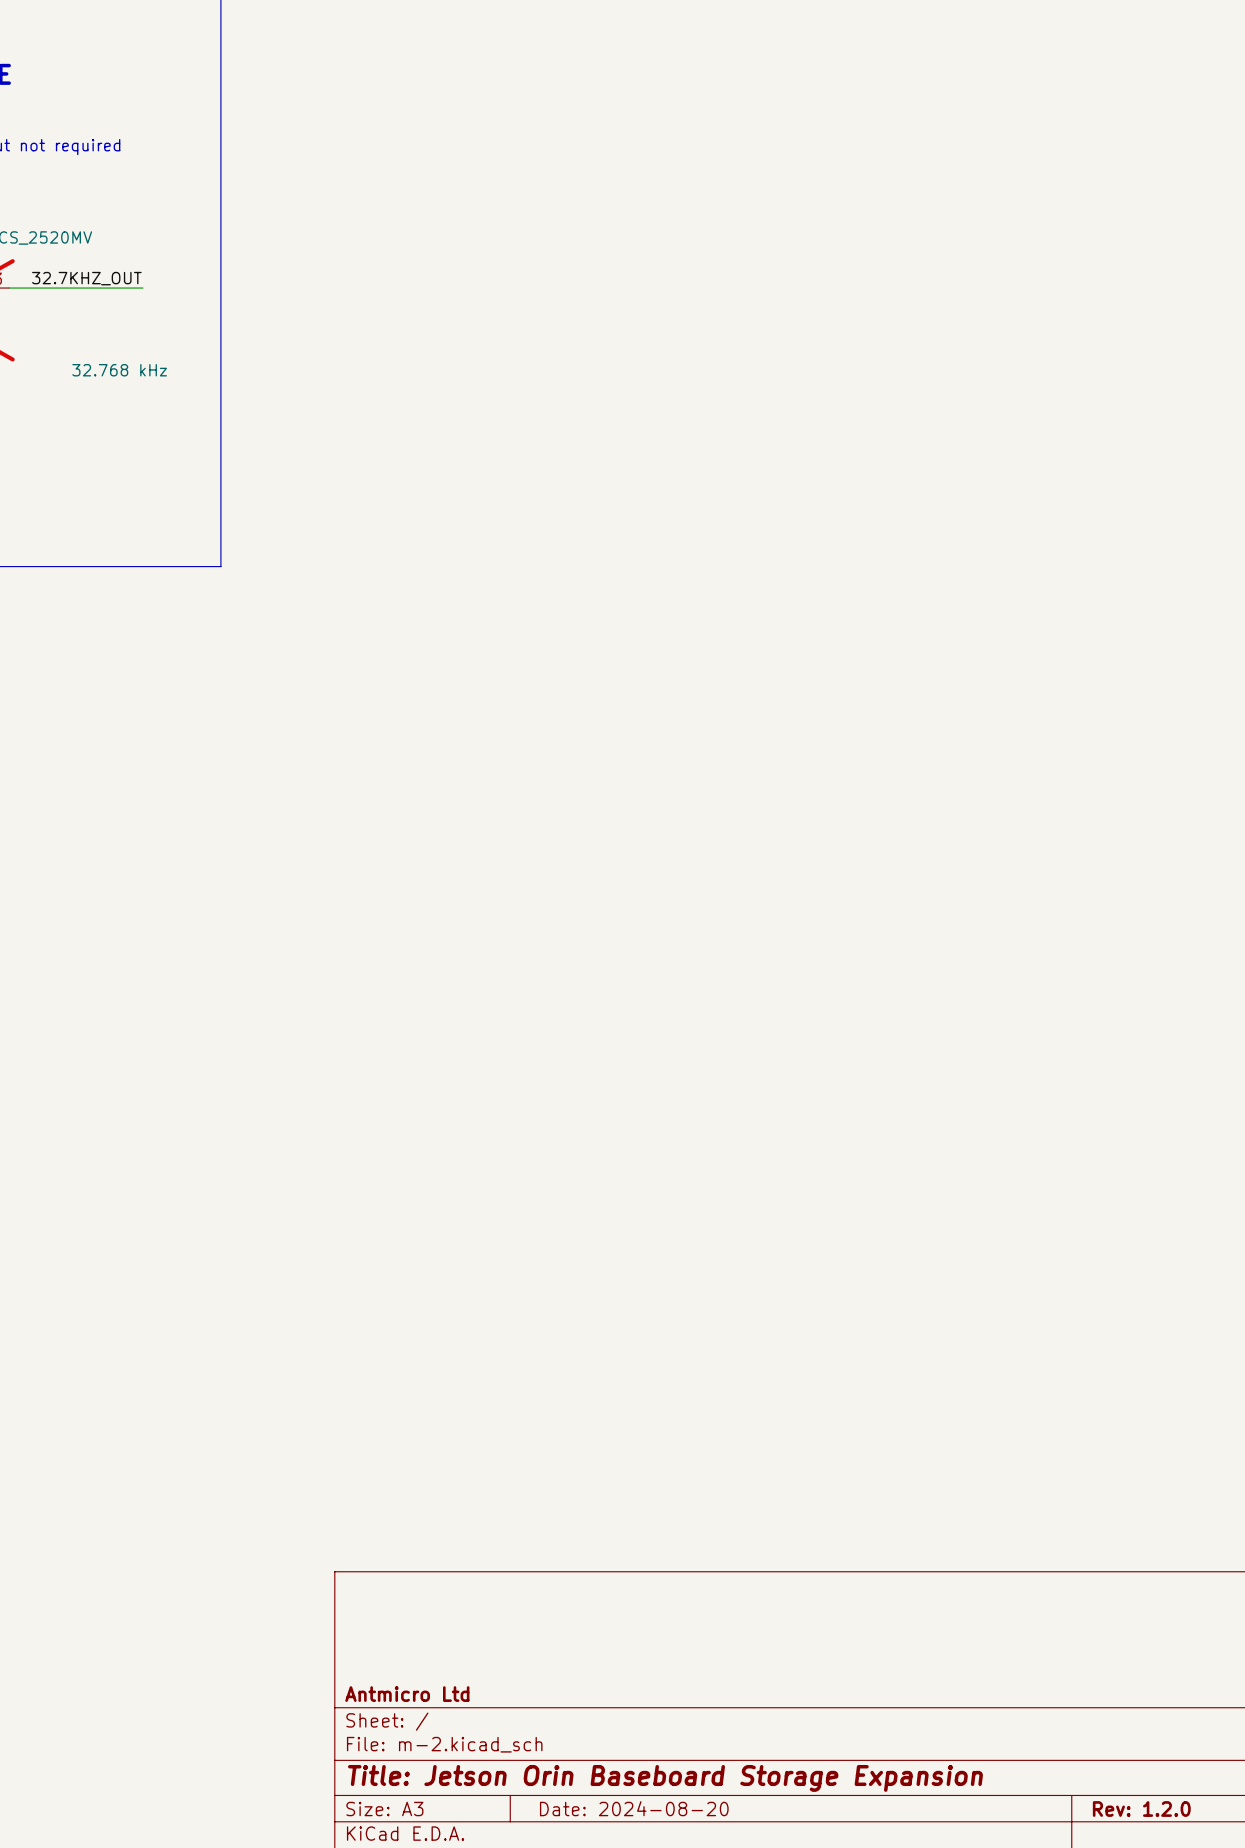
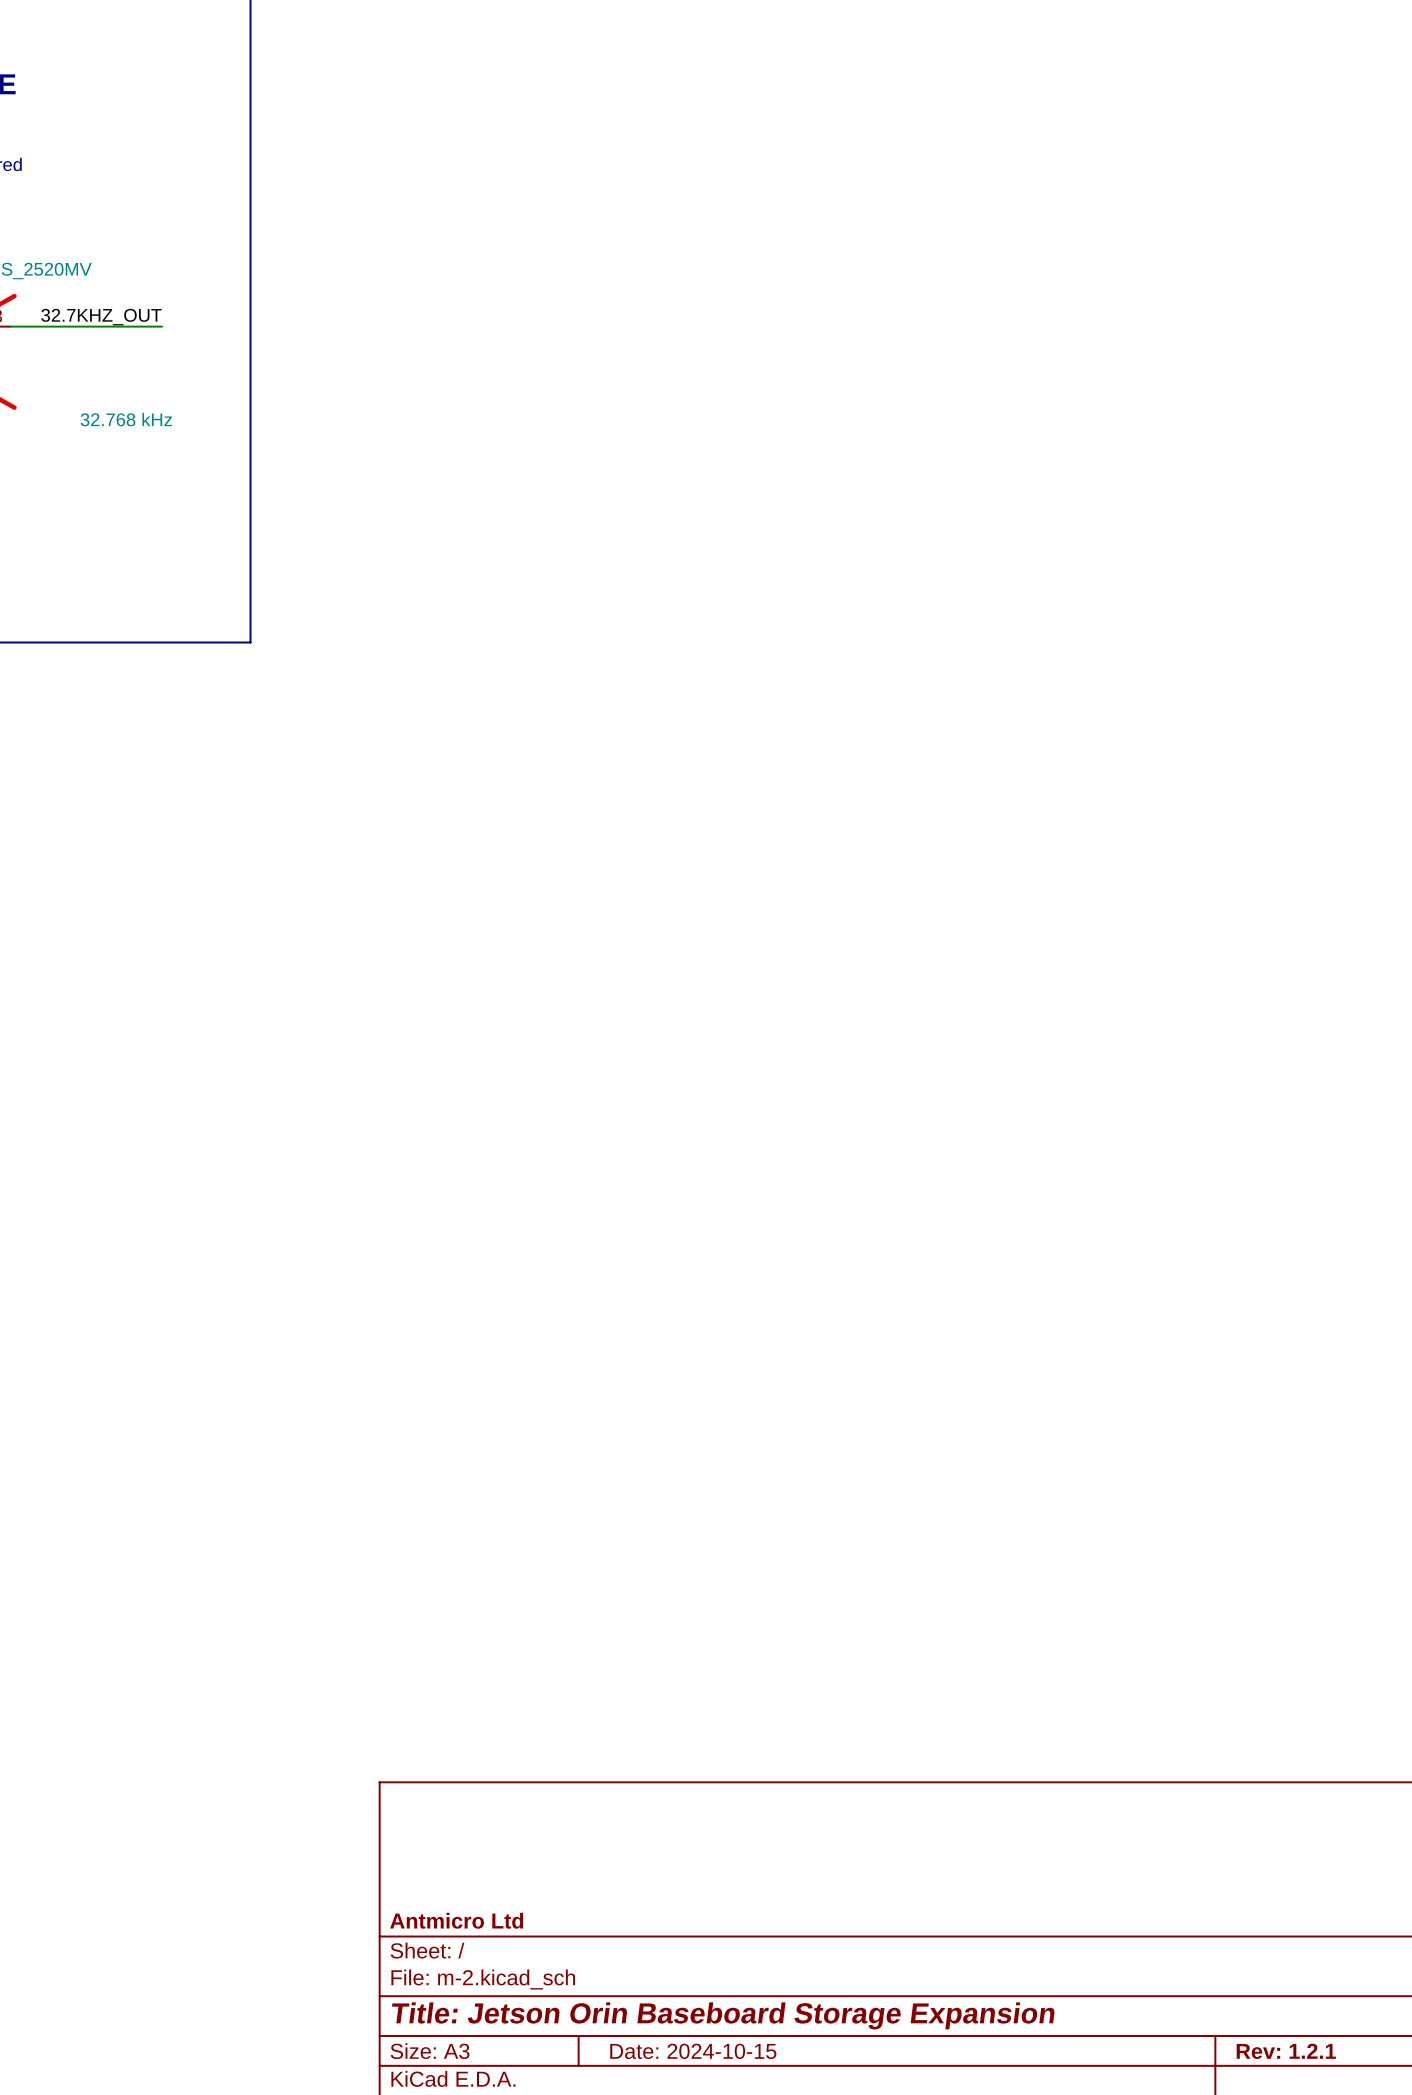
title block: Date: 2024-08-20 (634, 1808) -> Date: 2024-10-15 (693, 2051)
title block: Rev: 1.2.0 (1141, 1809) -> Rev: 1.2.1 (1286, 2051)

